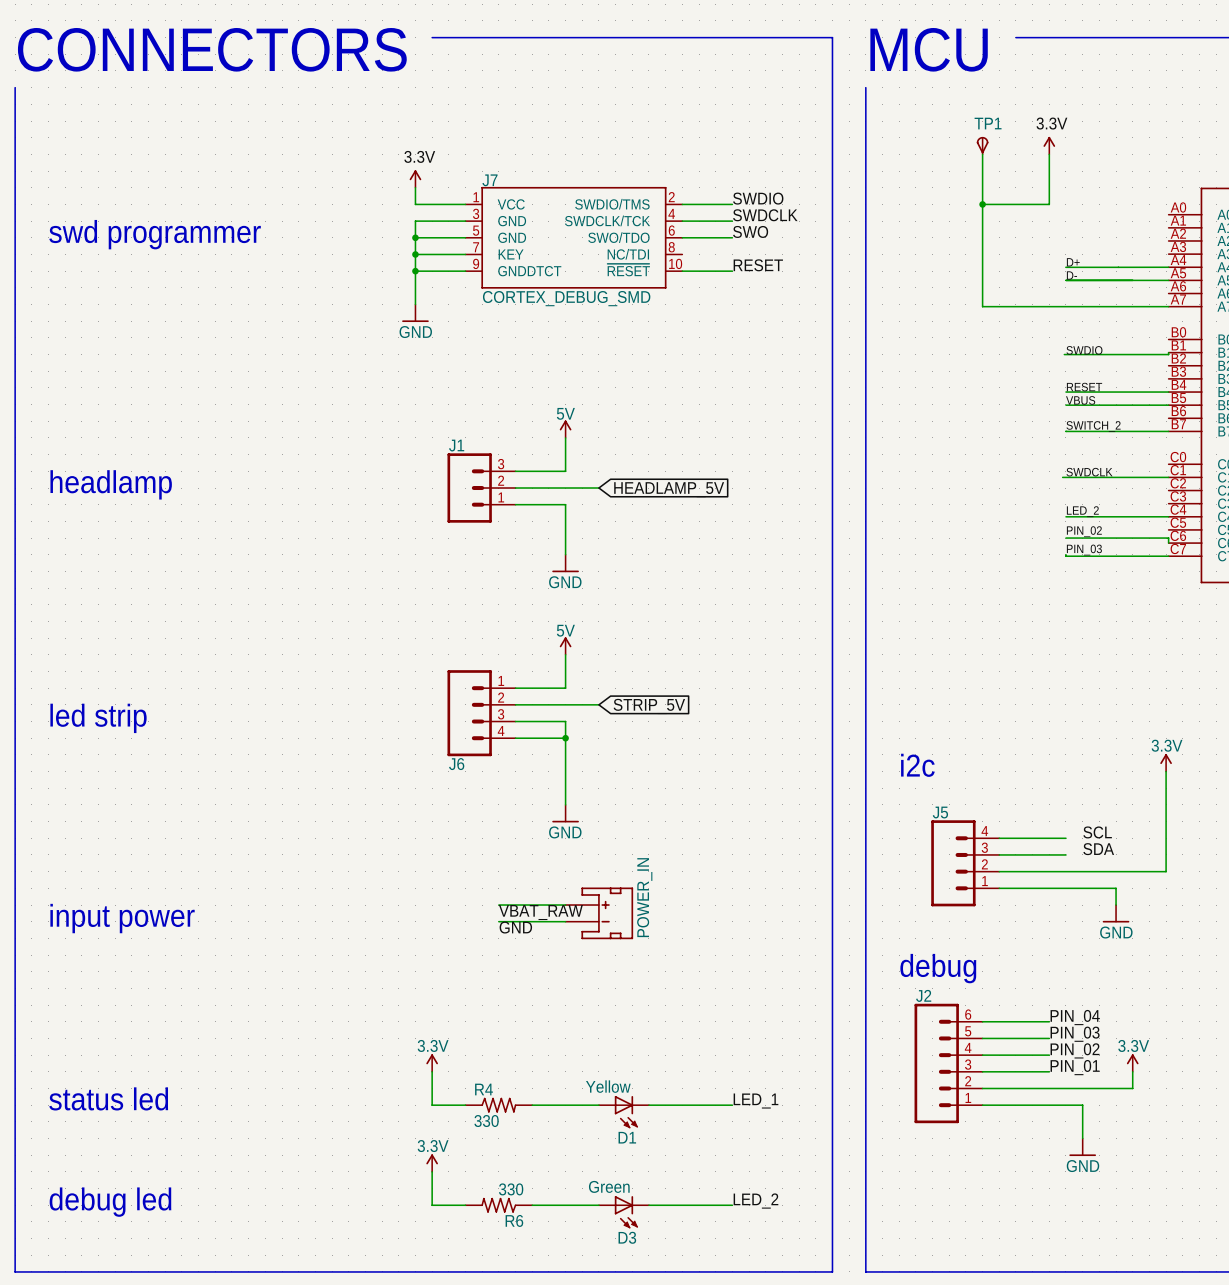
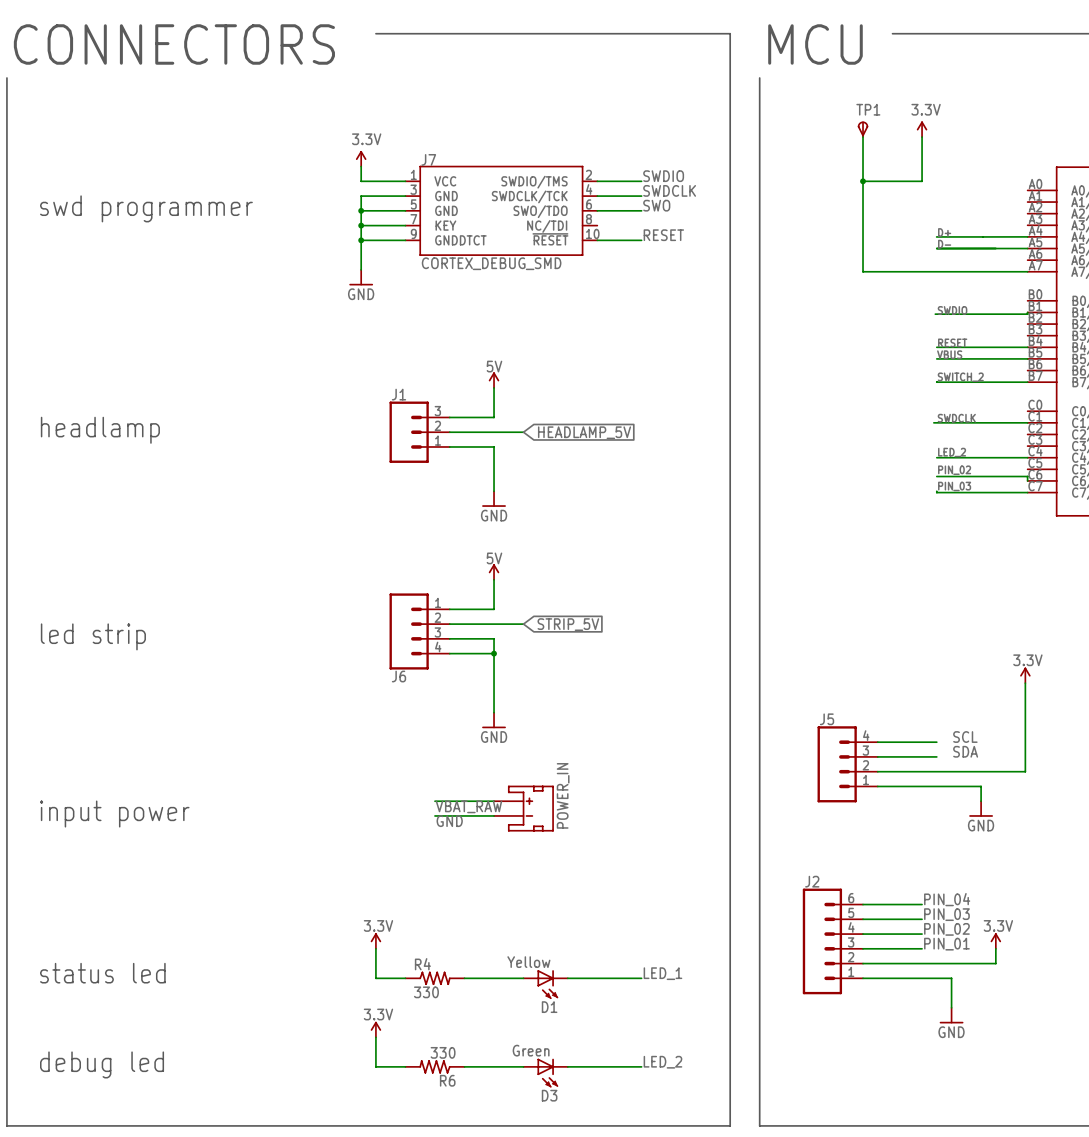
text: i2c (917, 765) -> none
text: debug (938, 968) -> none

